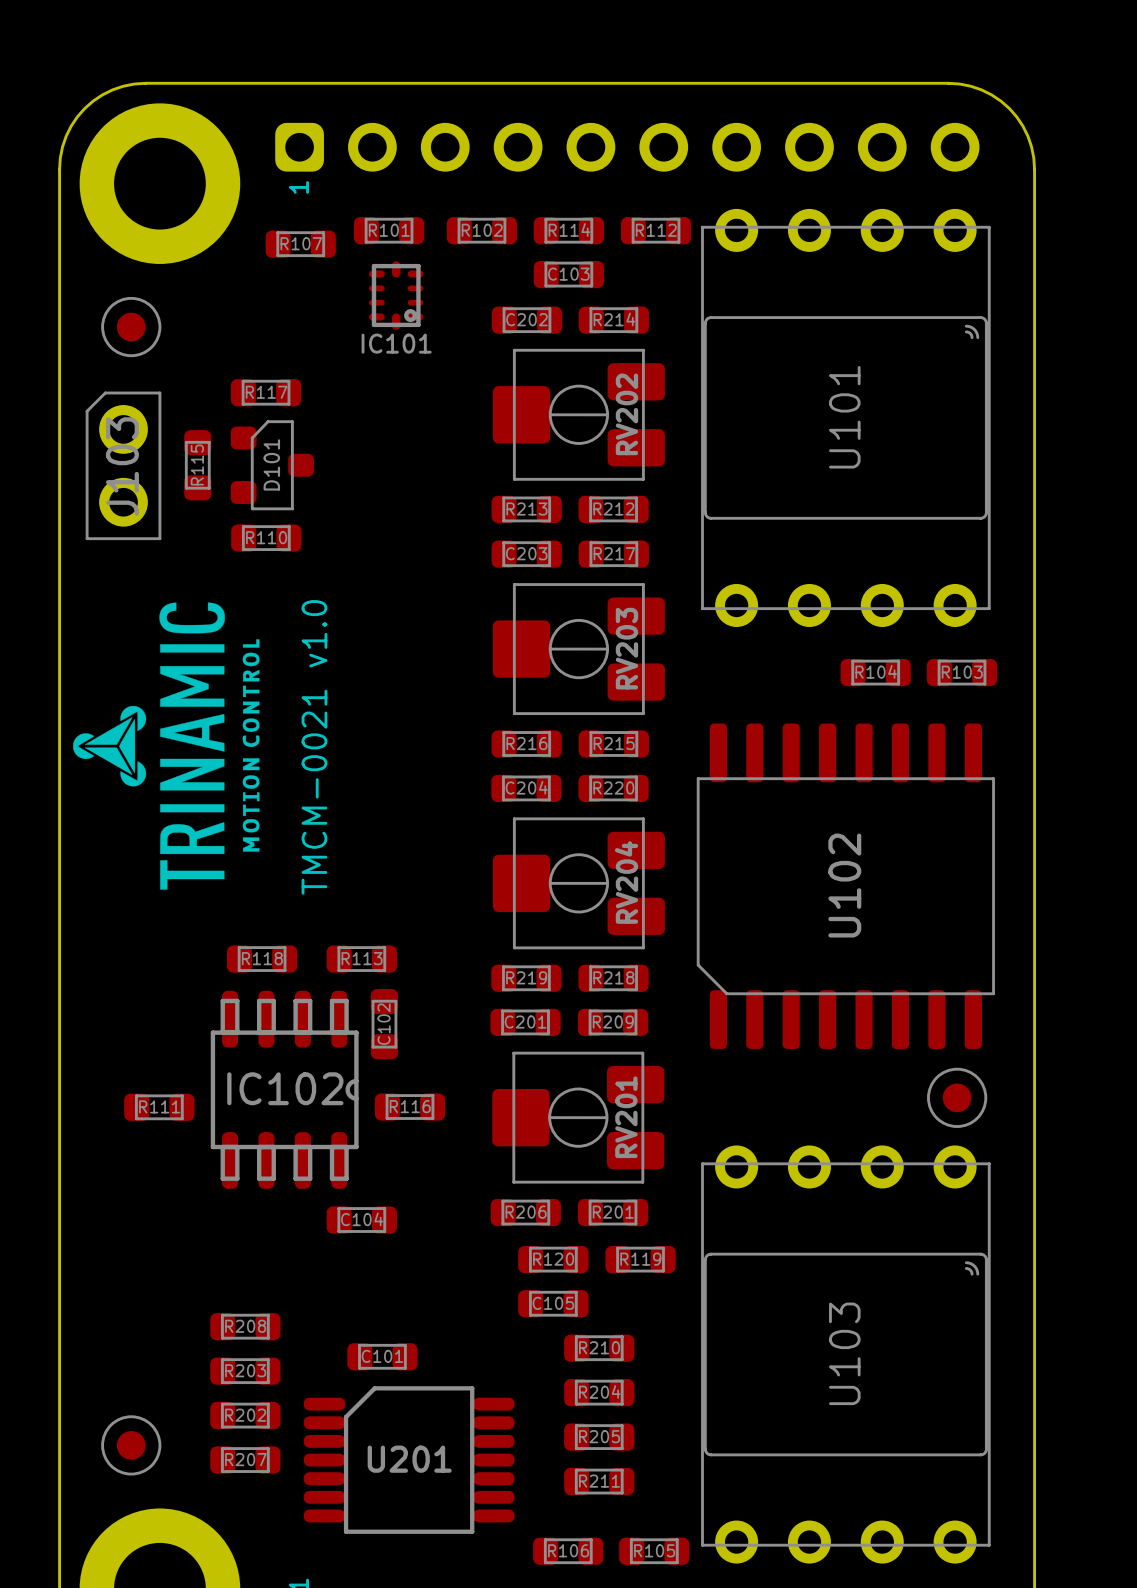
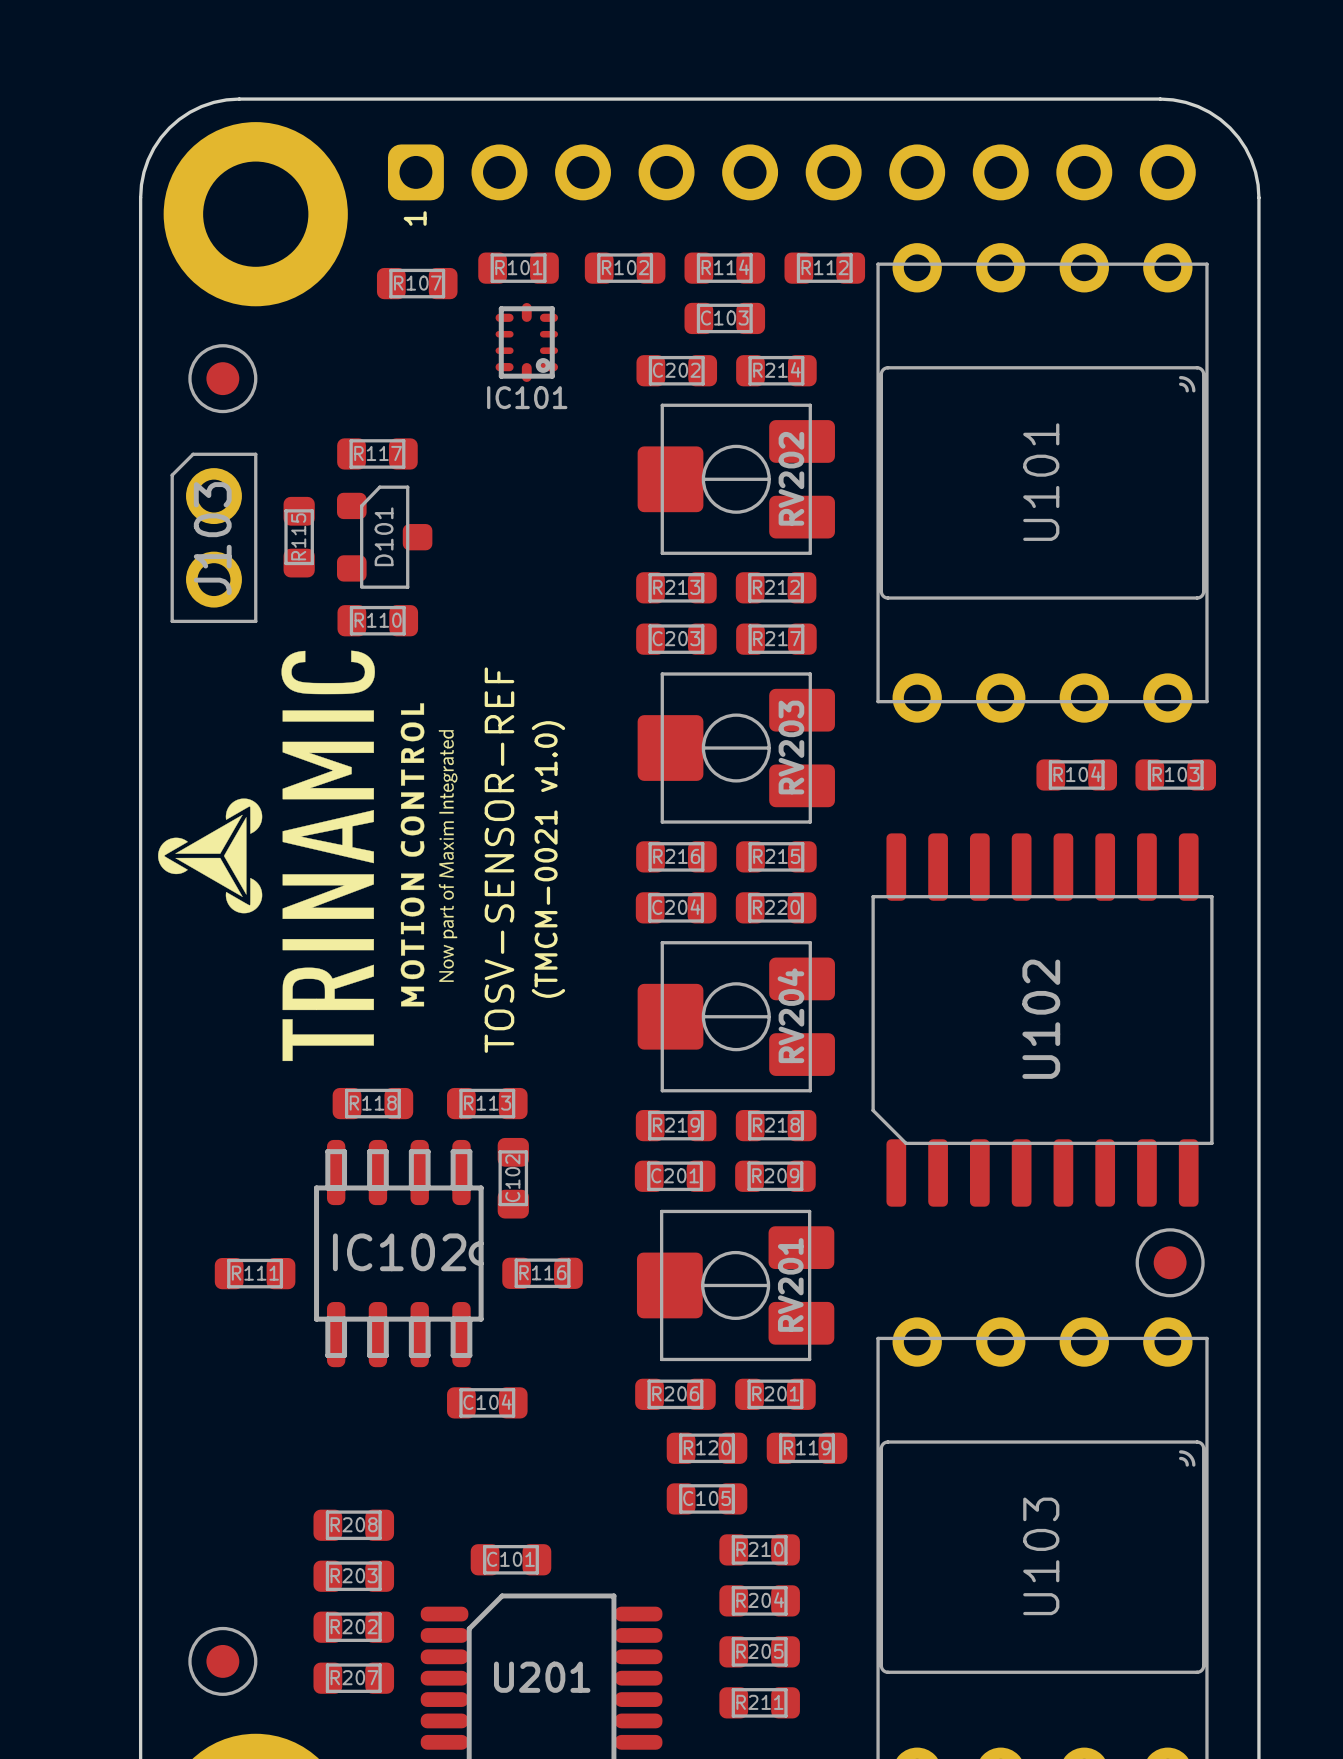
drawing: none -> [158, 650, 458, 1062]
drawing: [73, 602, 260, 890] -> none
text: none -> TOSV-SENSOR-REF (499, 860)
text: none -> (TMCM-0021 v1.0) (548, 859)
text: TMCM-0021 v1.0 (314, 747) -> none

